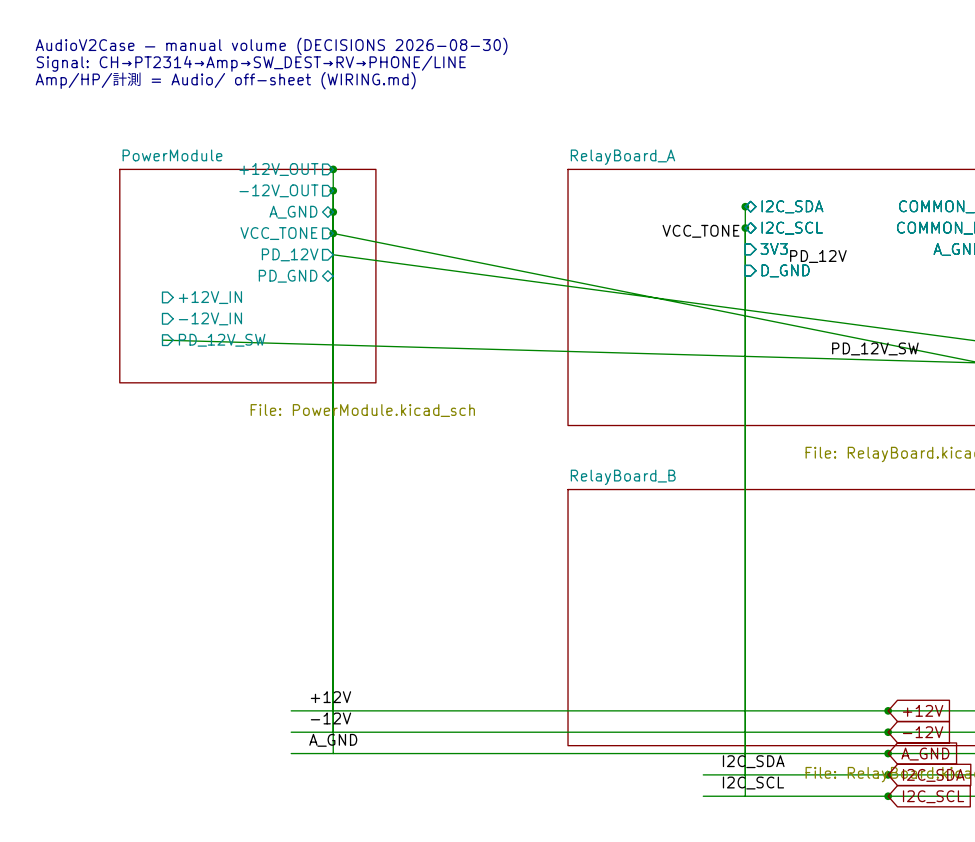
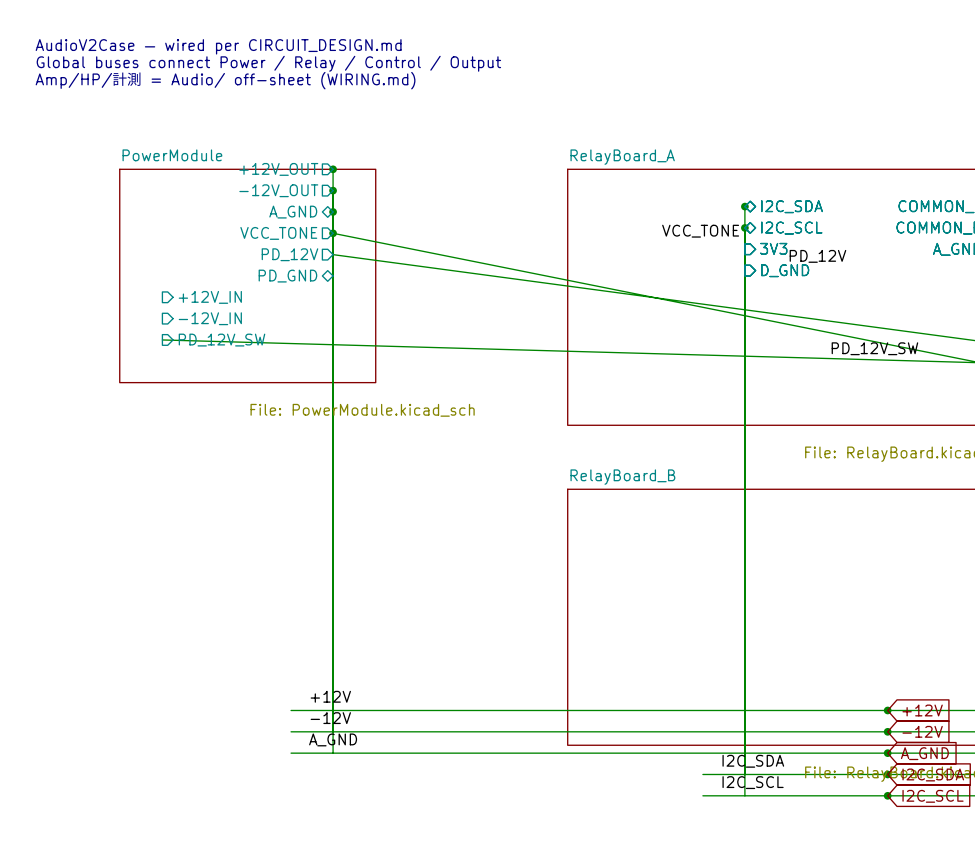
text: AudioV2Case — manual volume (DECISIONS 2026-08-30) (271, 46) -> AudioV2Case — wired per CIRCUIT_DESIGN.md (218, 46)
text: Signal: CH→PT2314→Amp→SW_DEST→RV→PHONE/LINE (251, 63) -> Global buses connect Power / Relay / Control / Output (268, 63)

